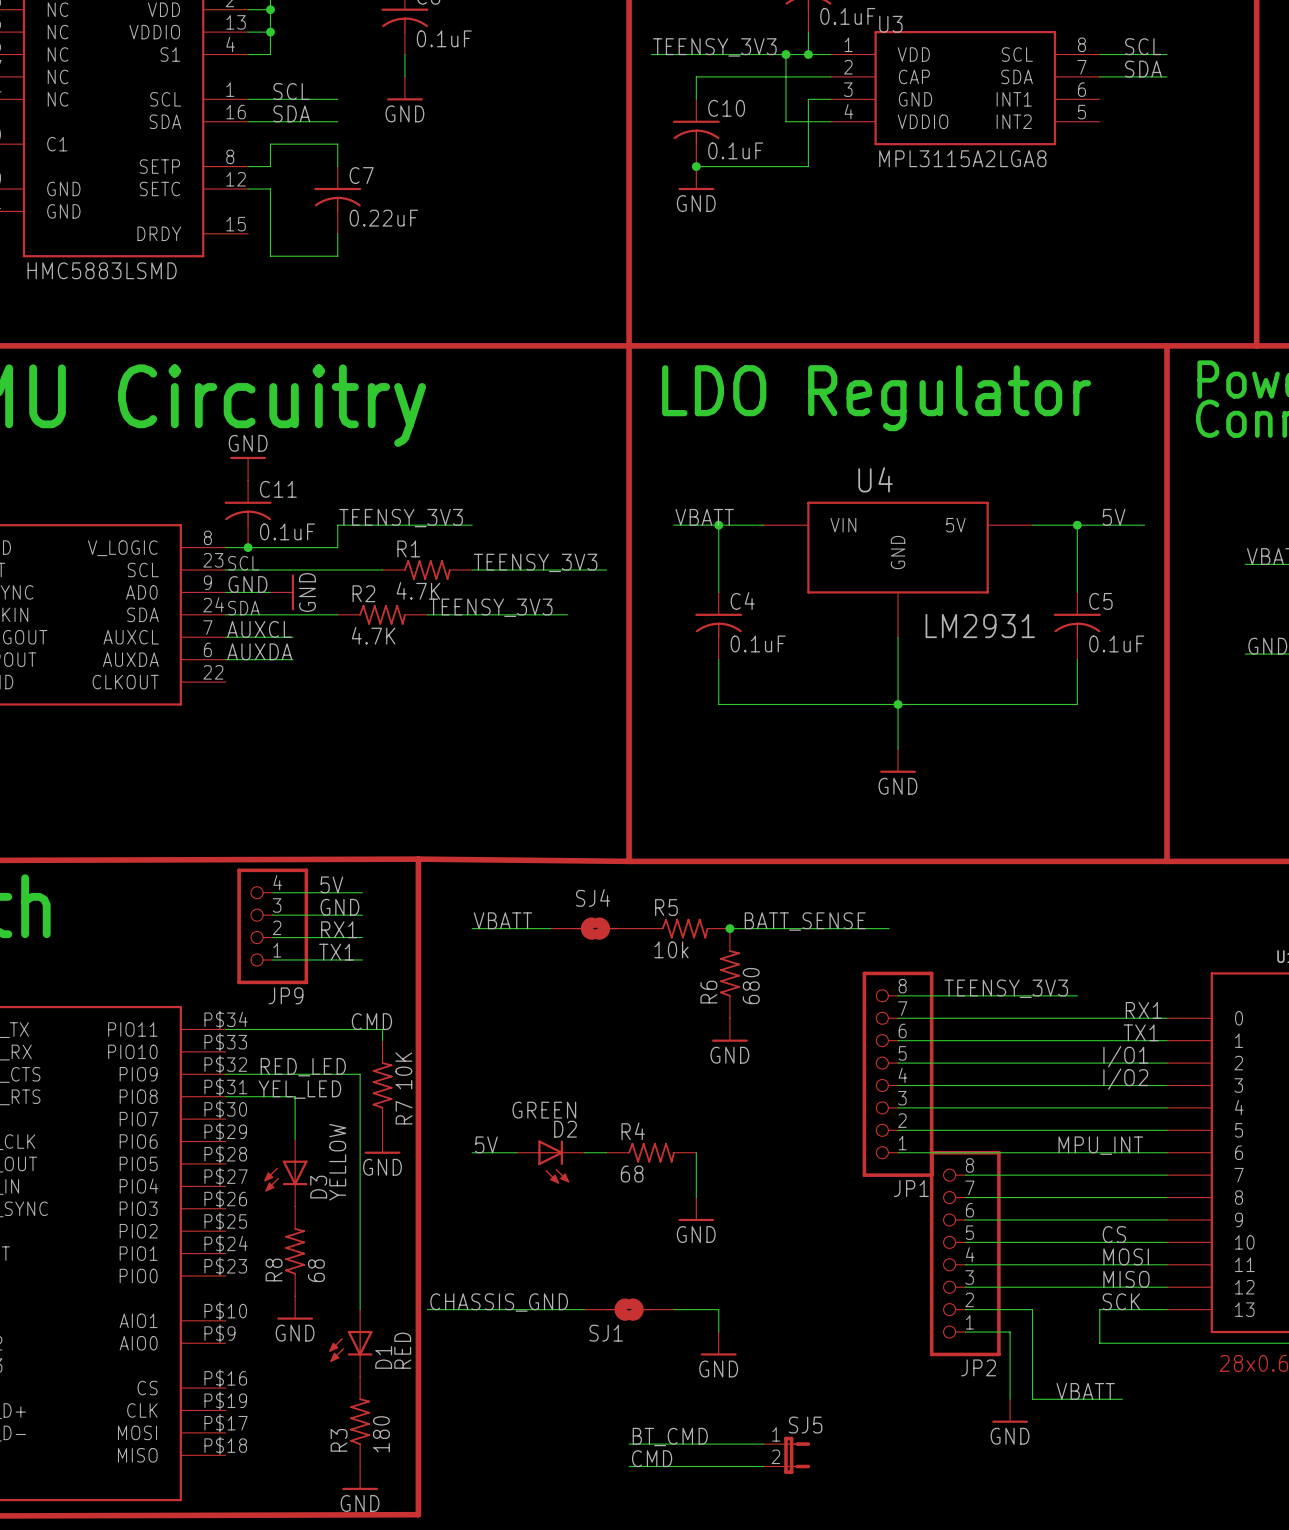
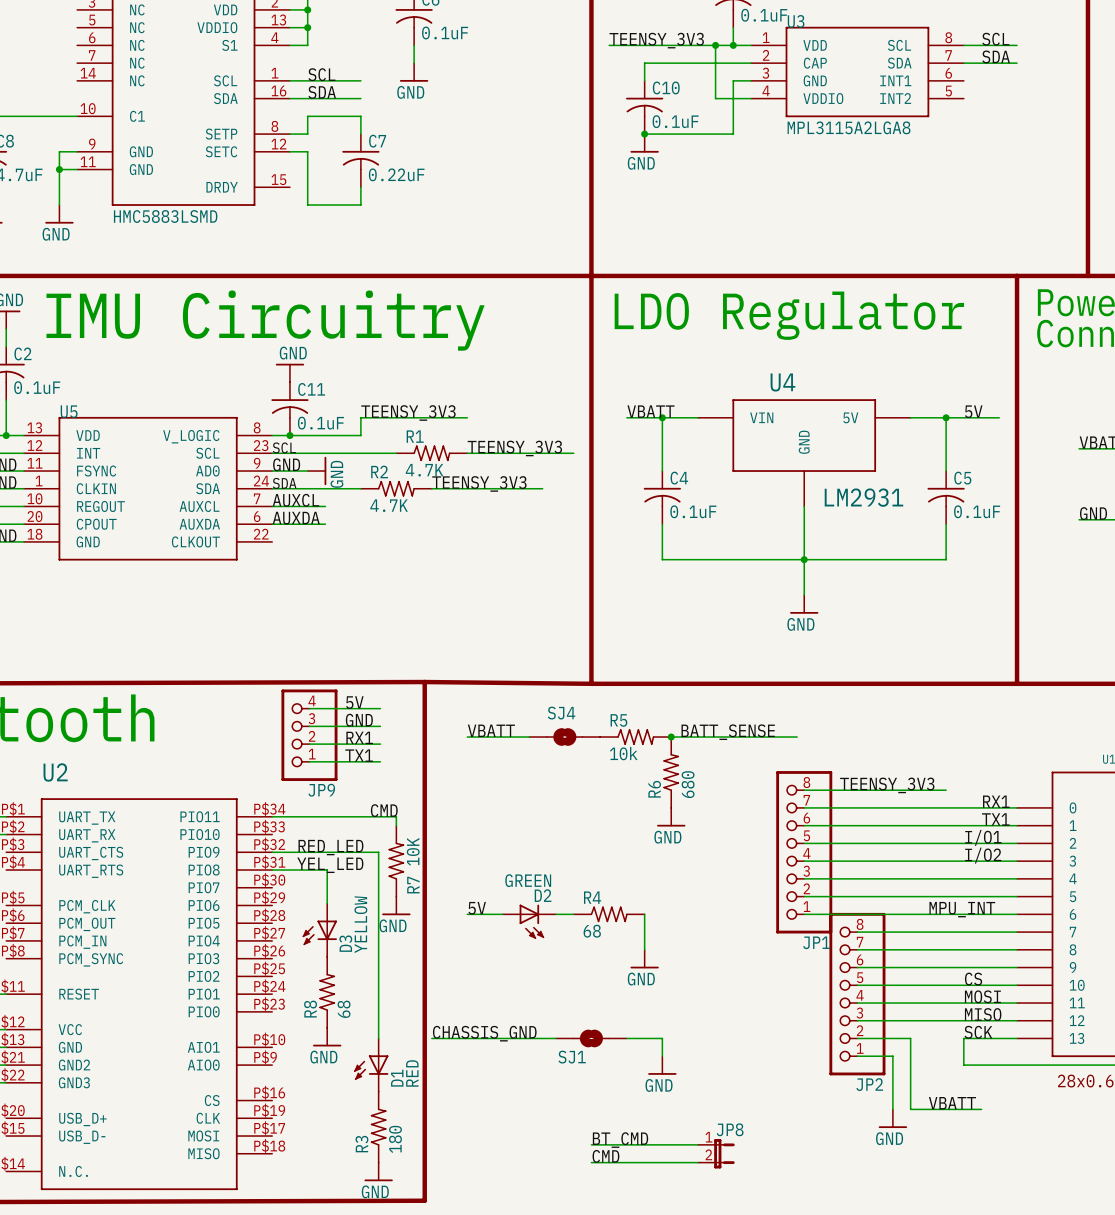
SJ5 name: SJ5 (805, 1425) -> JP8 (730, 1129)

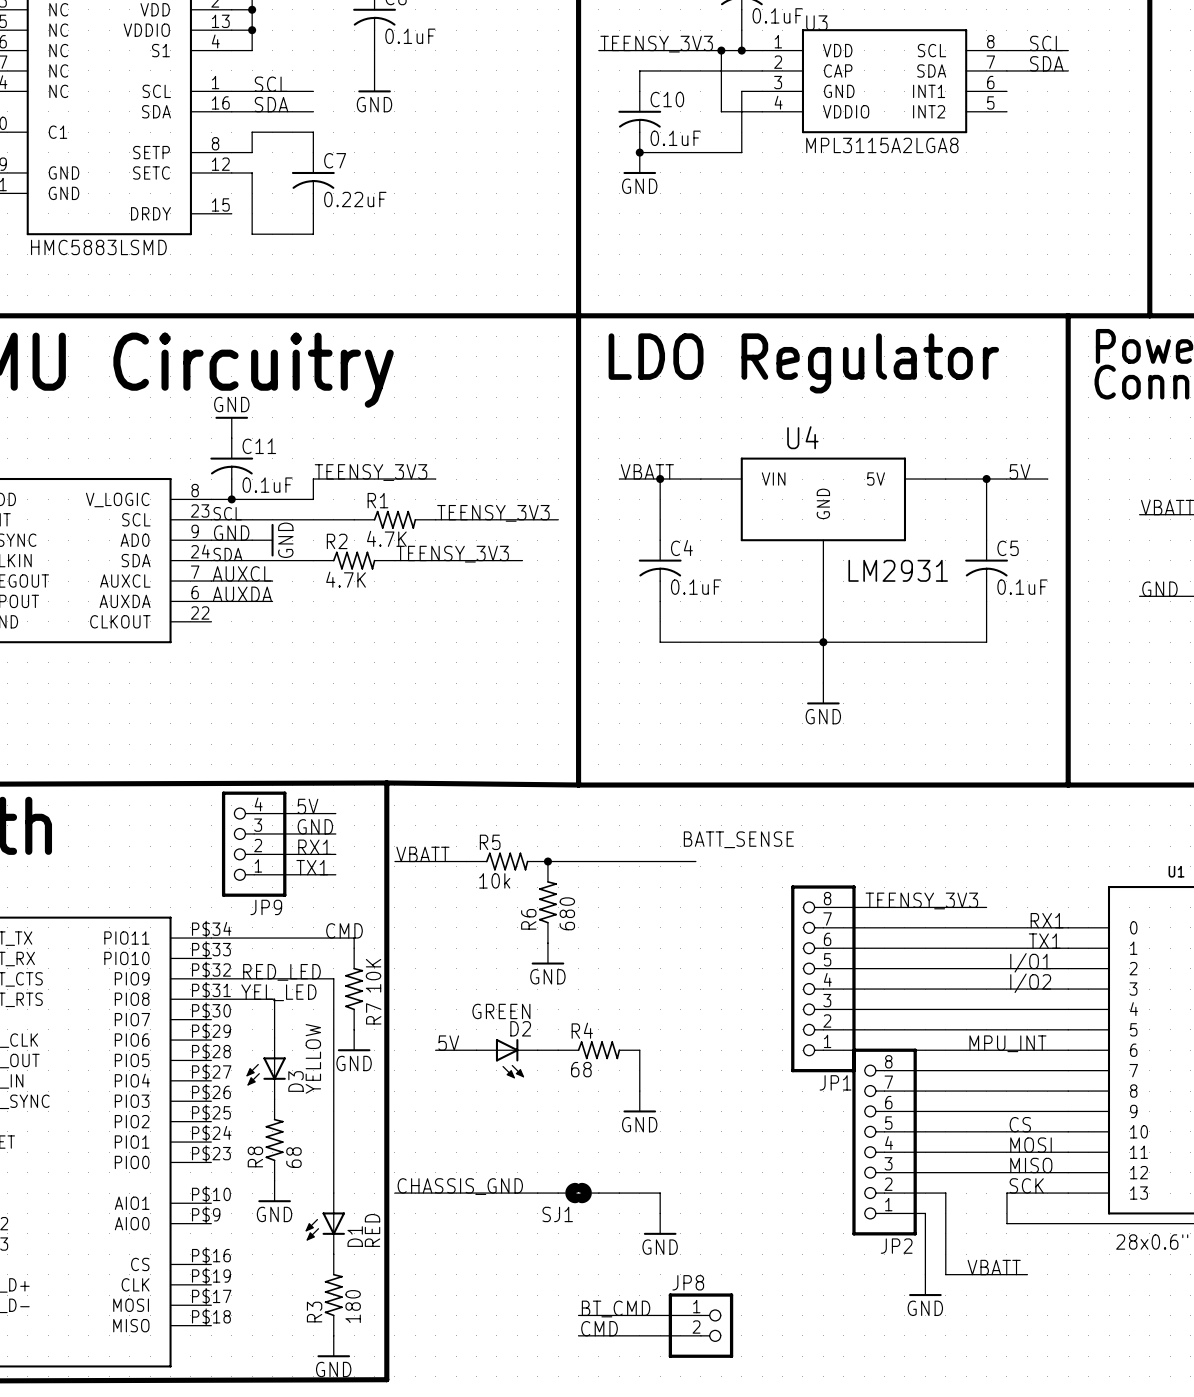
label position: VBATT (491, 730) -> VBATT (422, 854)
wire: (467, 737) (529, 737) -> (394, 861) (466, 861)
SJ4: (564, 737) -> none
R5 position: (635, 737) -> (507, 861)
wire: (671, 737) (797, 737) -> none
junction: (671, 737) -> none
wire: none -> (547, 861) (695, 861)
junction: none -> (547, 861)
R6 position: (671, 772) -> (547, 902)
power symbol position: GND (671, 817) -> GND (547, 953)
JP8 name position: JP8 (730, 1129) -> JP8 (688, 1282)
JP8 symbol: [697, 1139, 735, 1169] -> [668, 1293, 734, 1358]

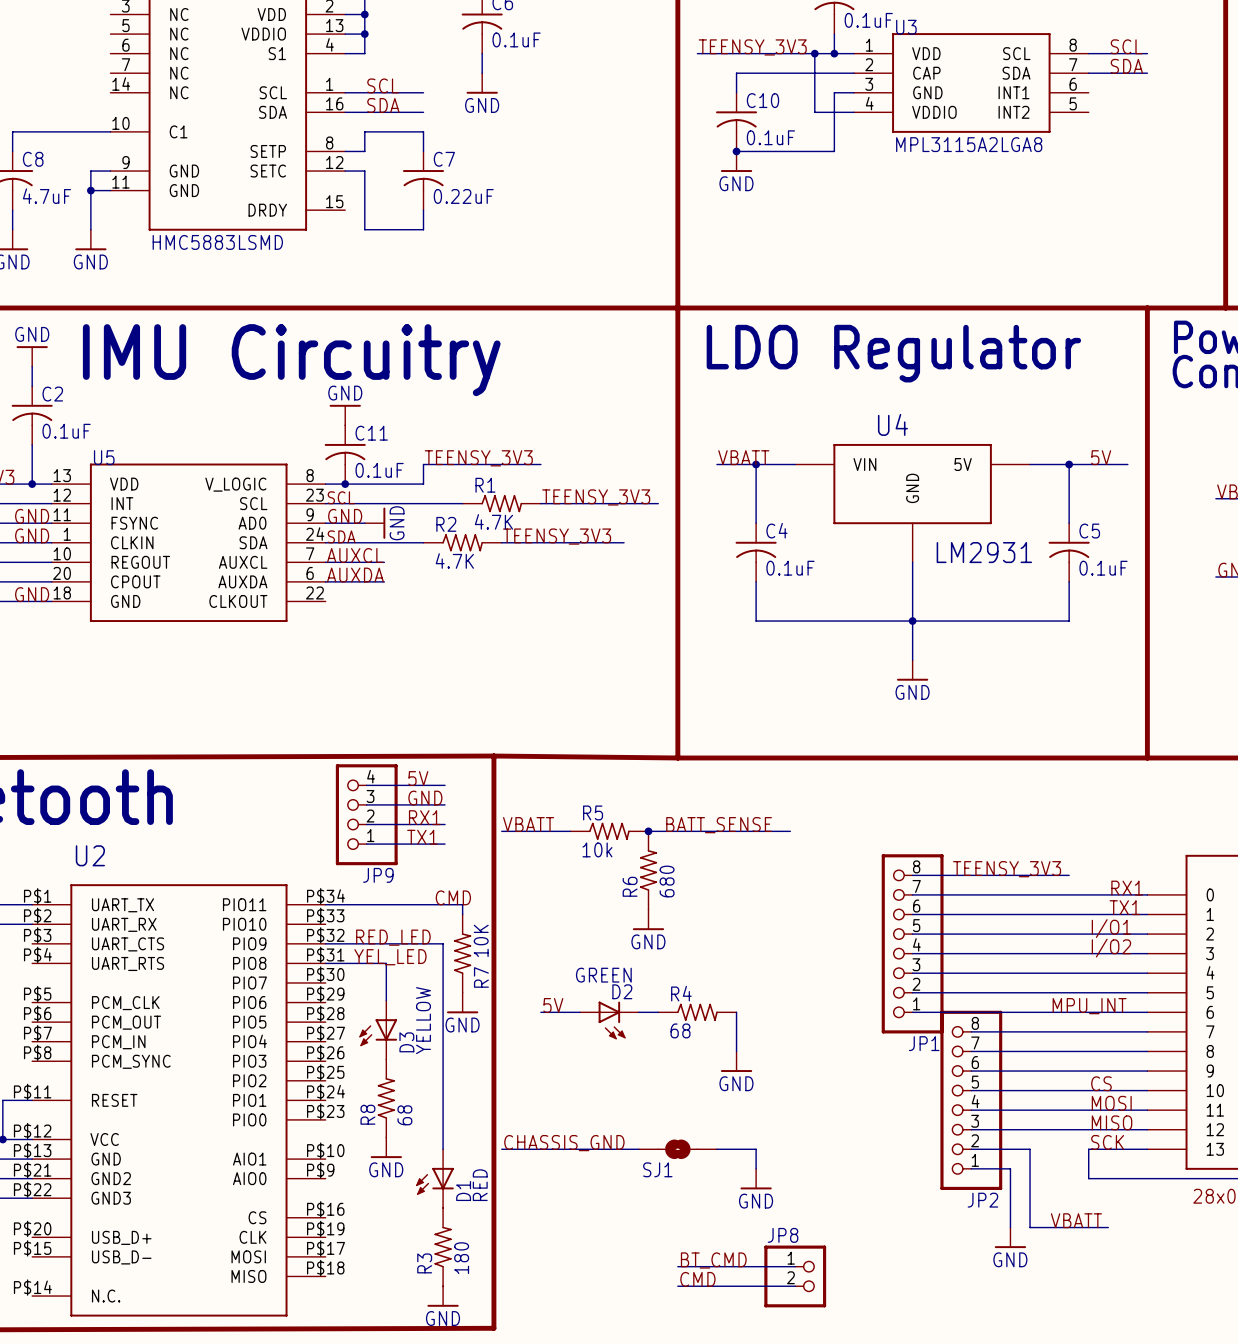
label position: BATT_SENSE (738, 839) -> BATT_SENSE (719, 825)

